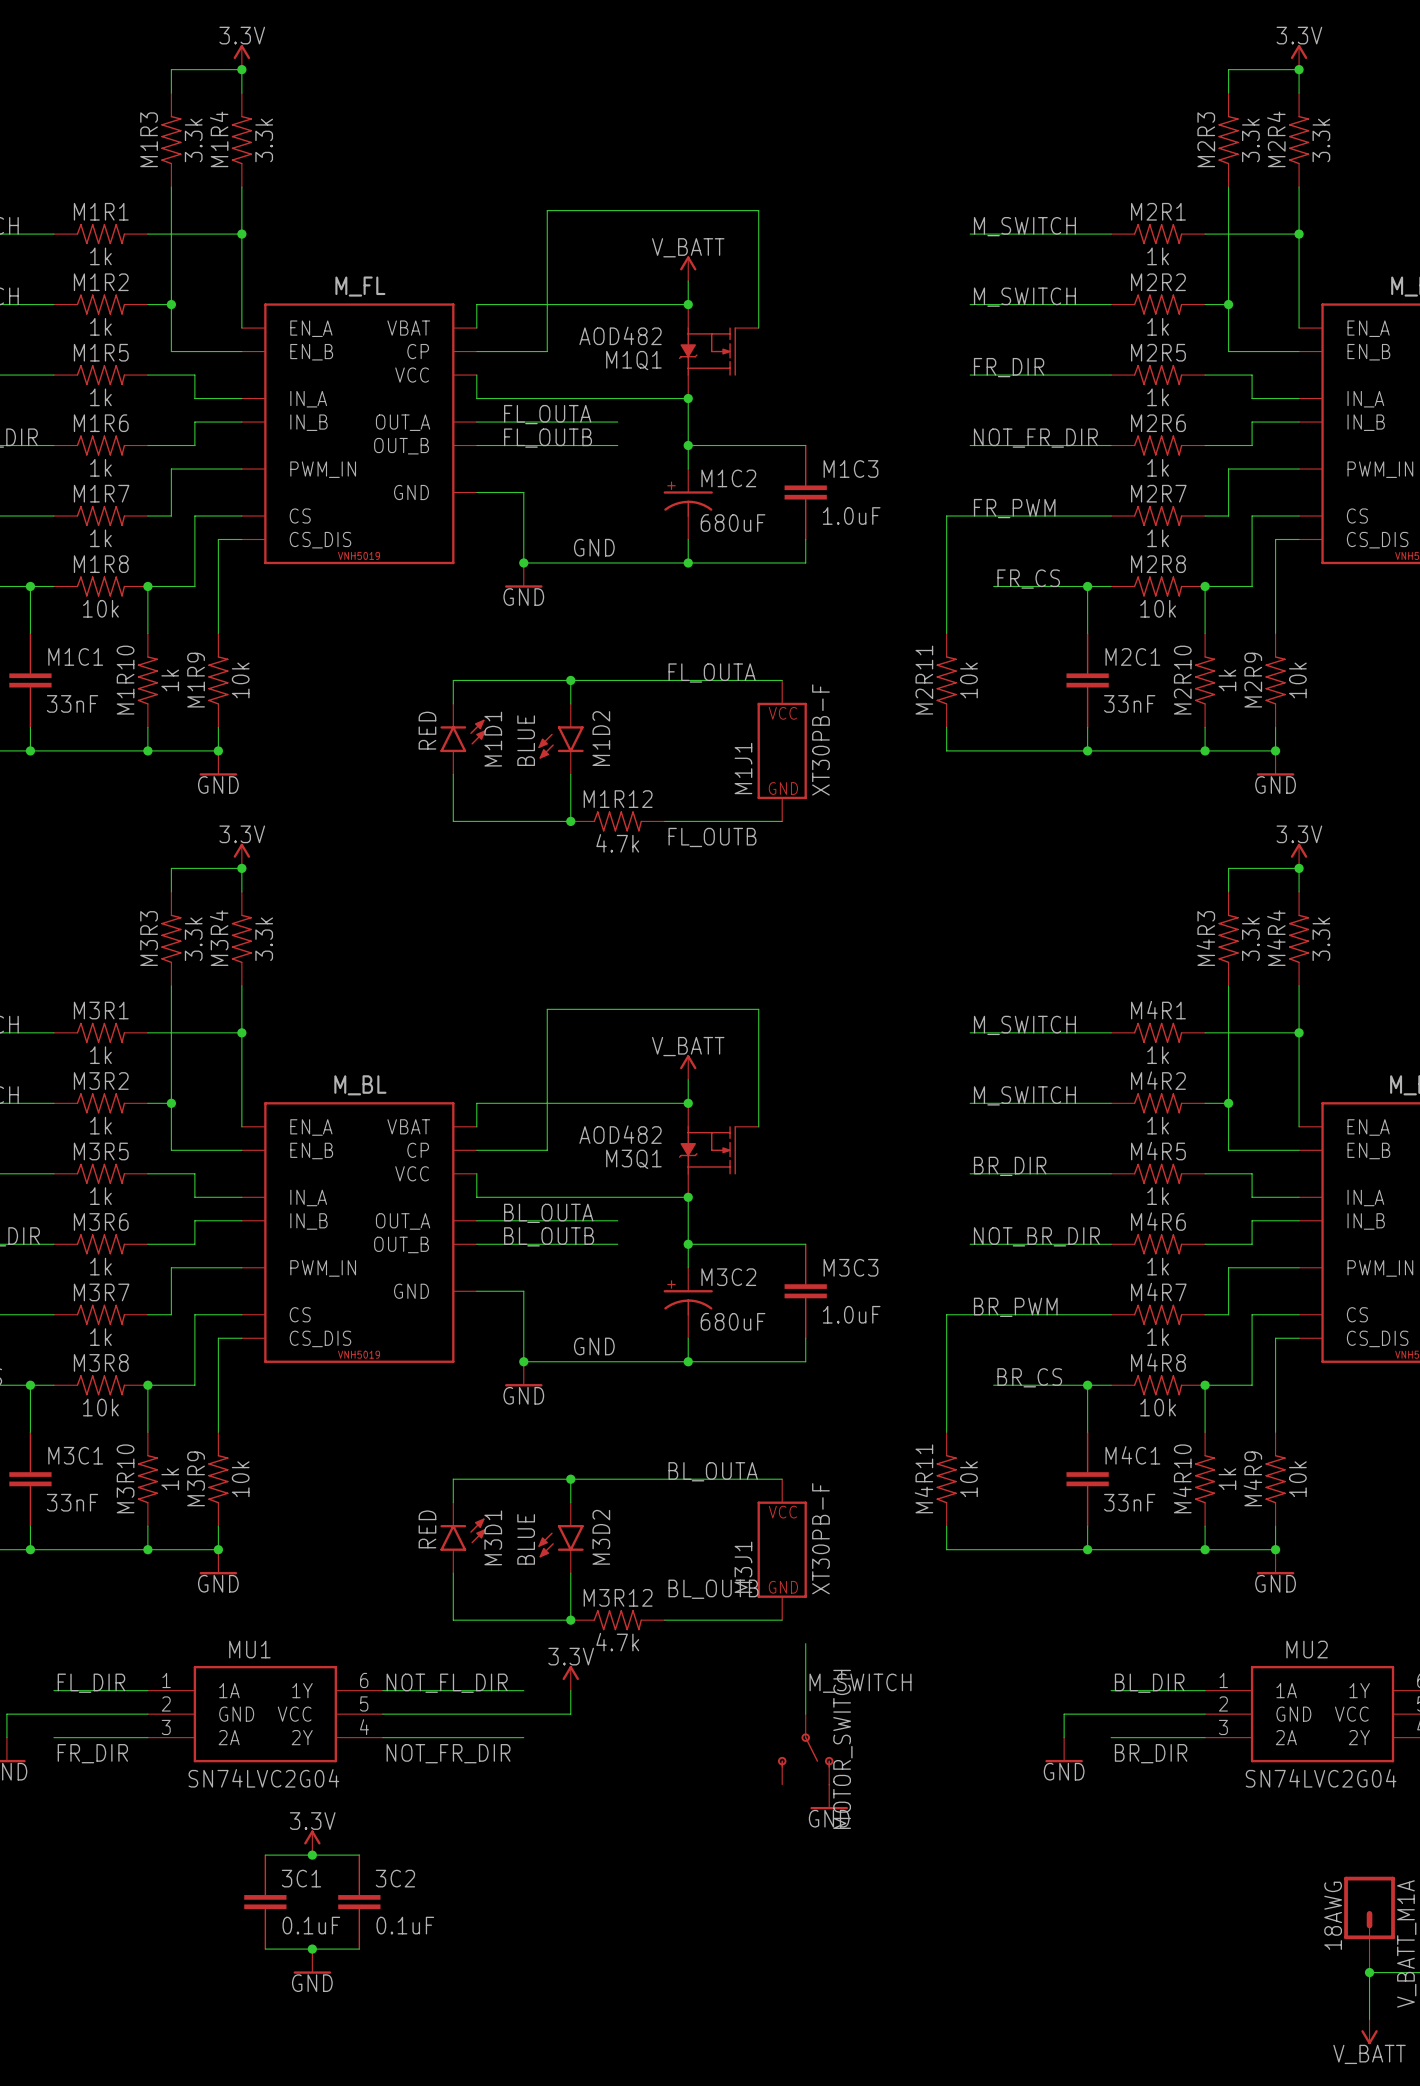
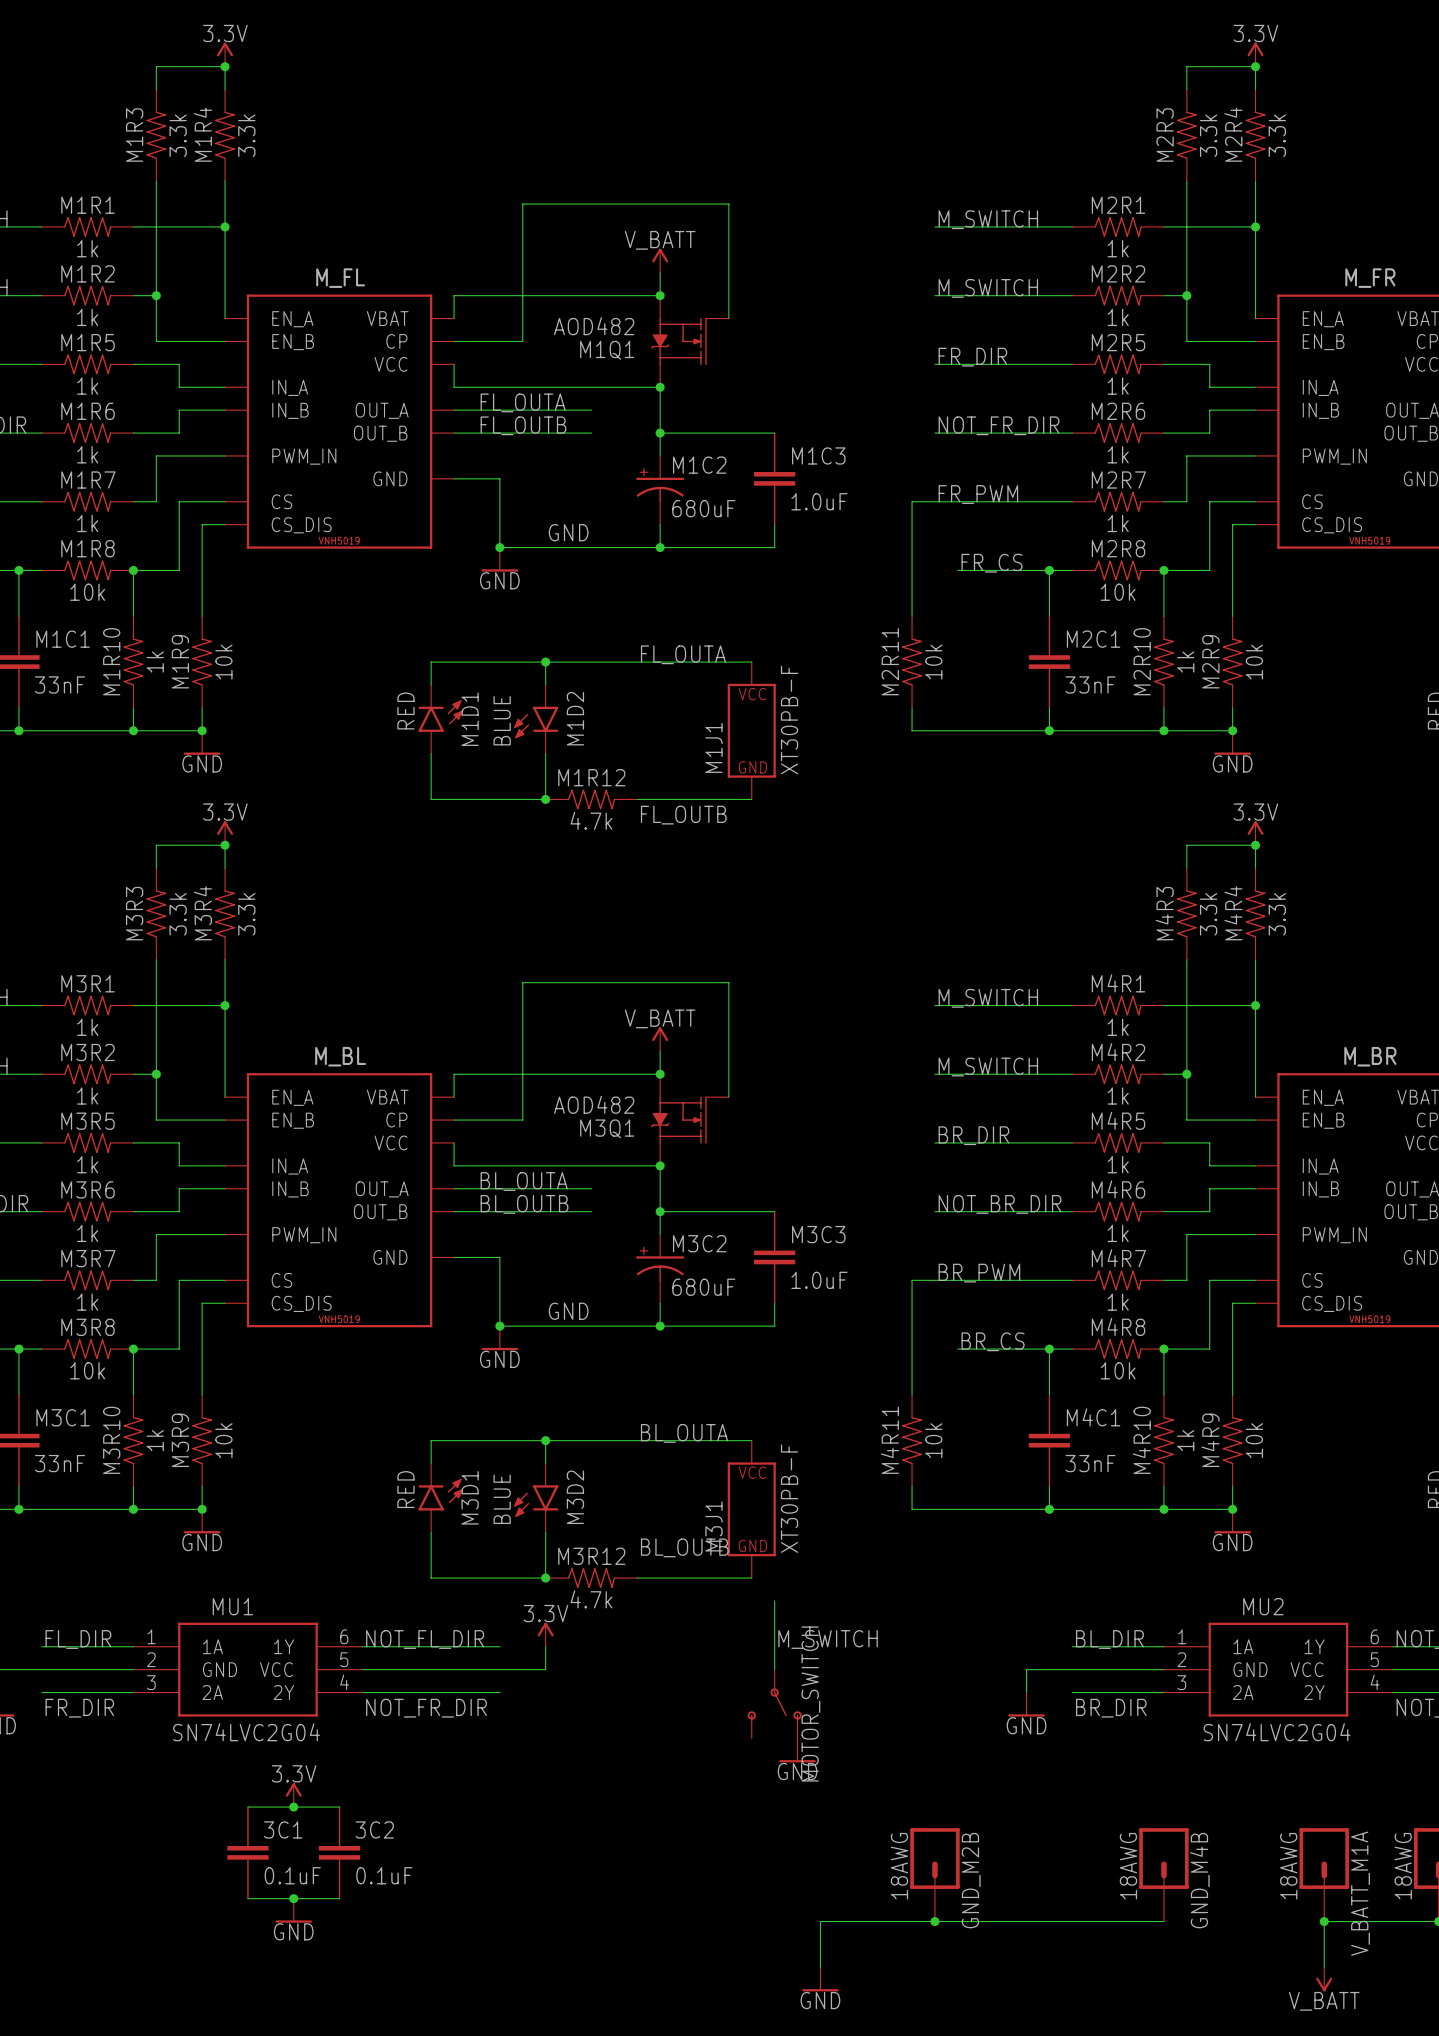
GND_M2B: none -> 18AWG (934, 1874)
GND_M4B: none -> 18AWG (1163, 1874)
junction: none -> (934, 1921)
wire: none -> (1163, 1921) (820, 1921) (820, 1967)
power symbol: none -> GND (820, 1979)

